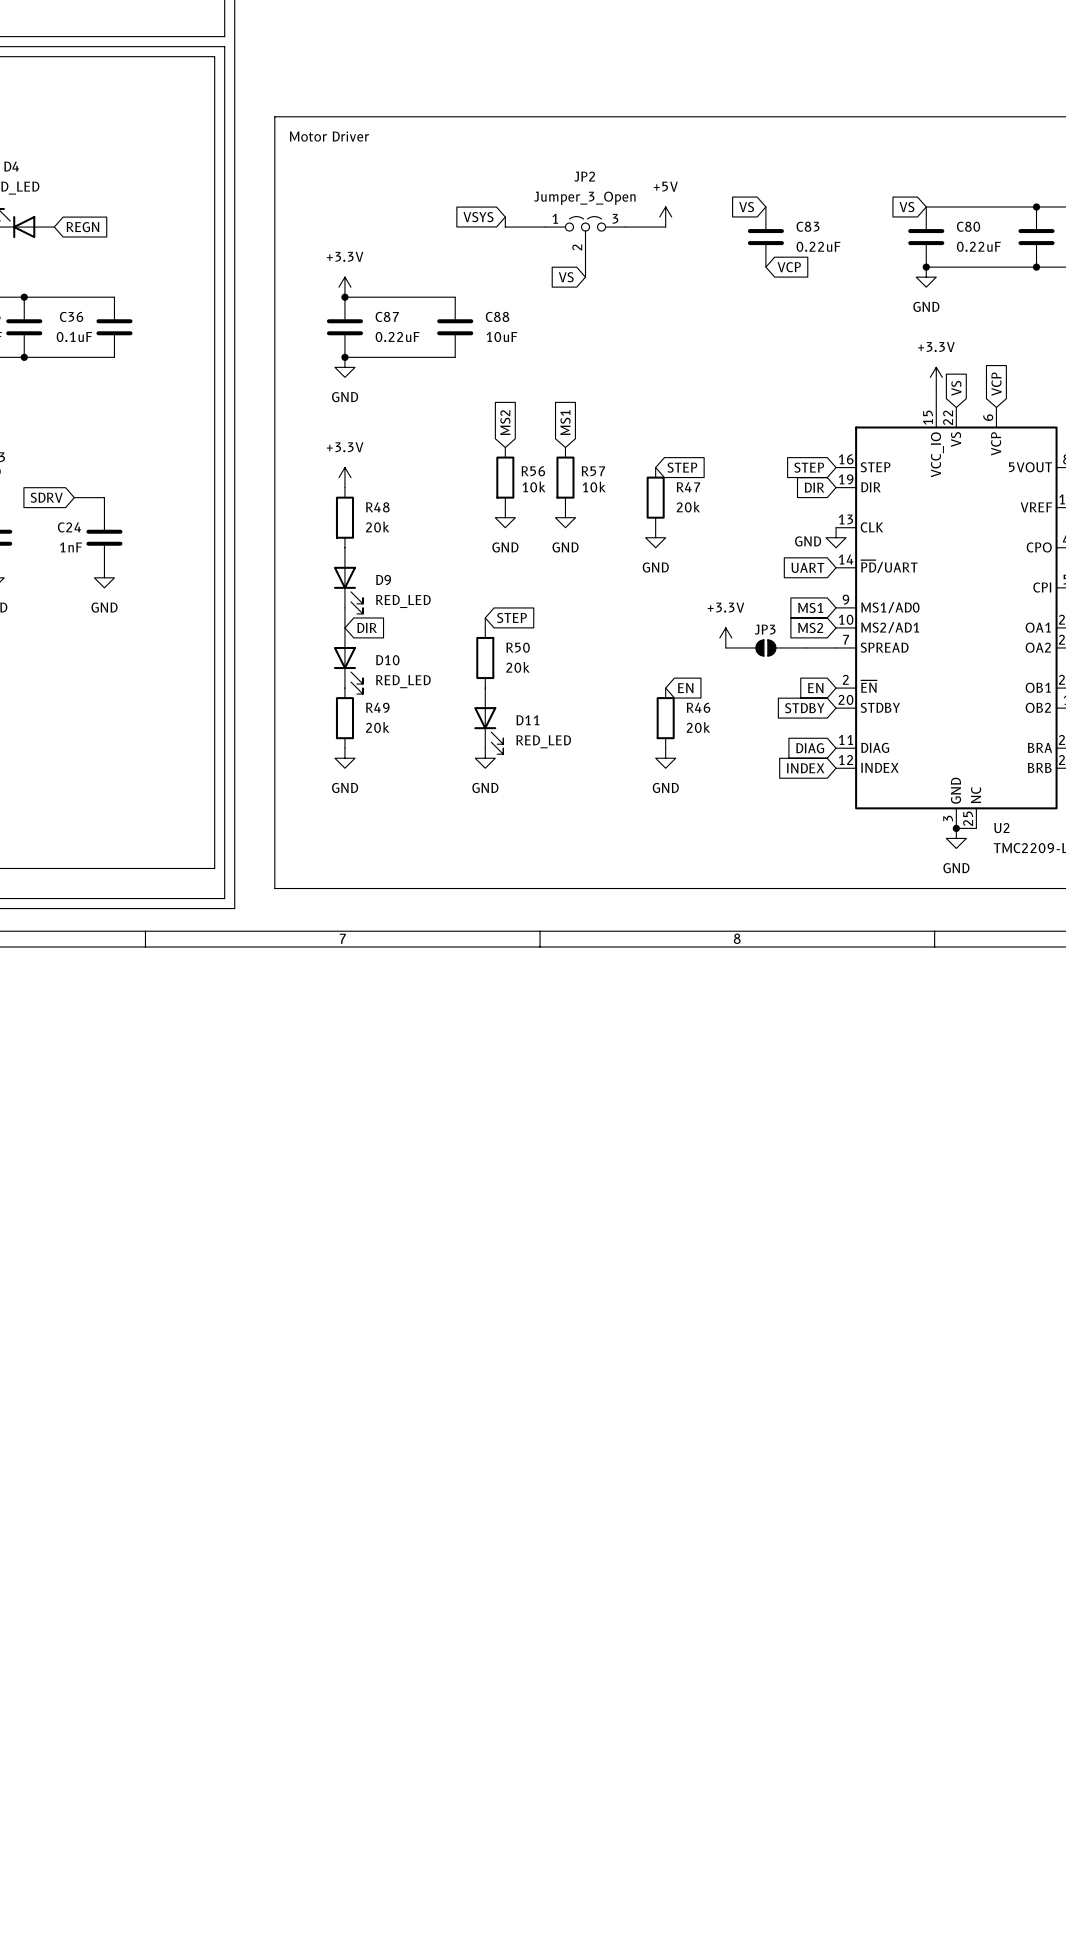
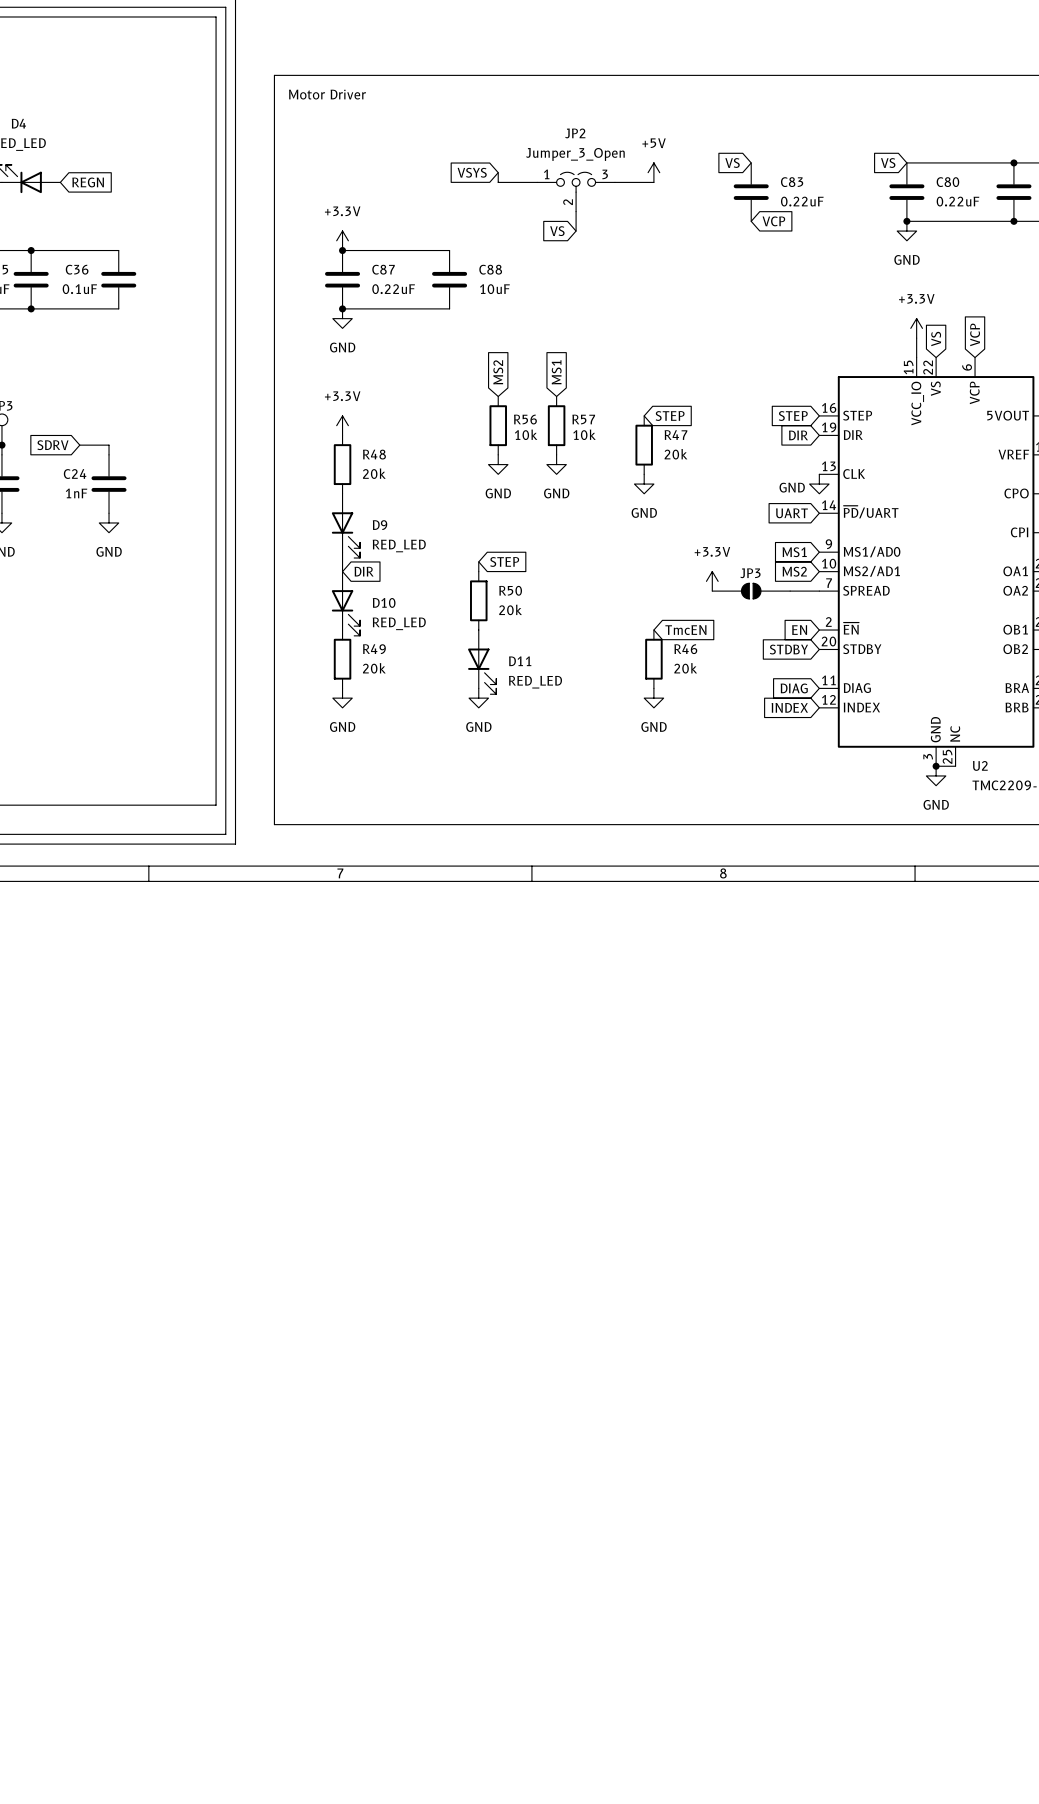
global label: EN (685, 688) -> TmcEN (685, 630)

